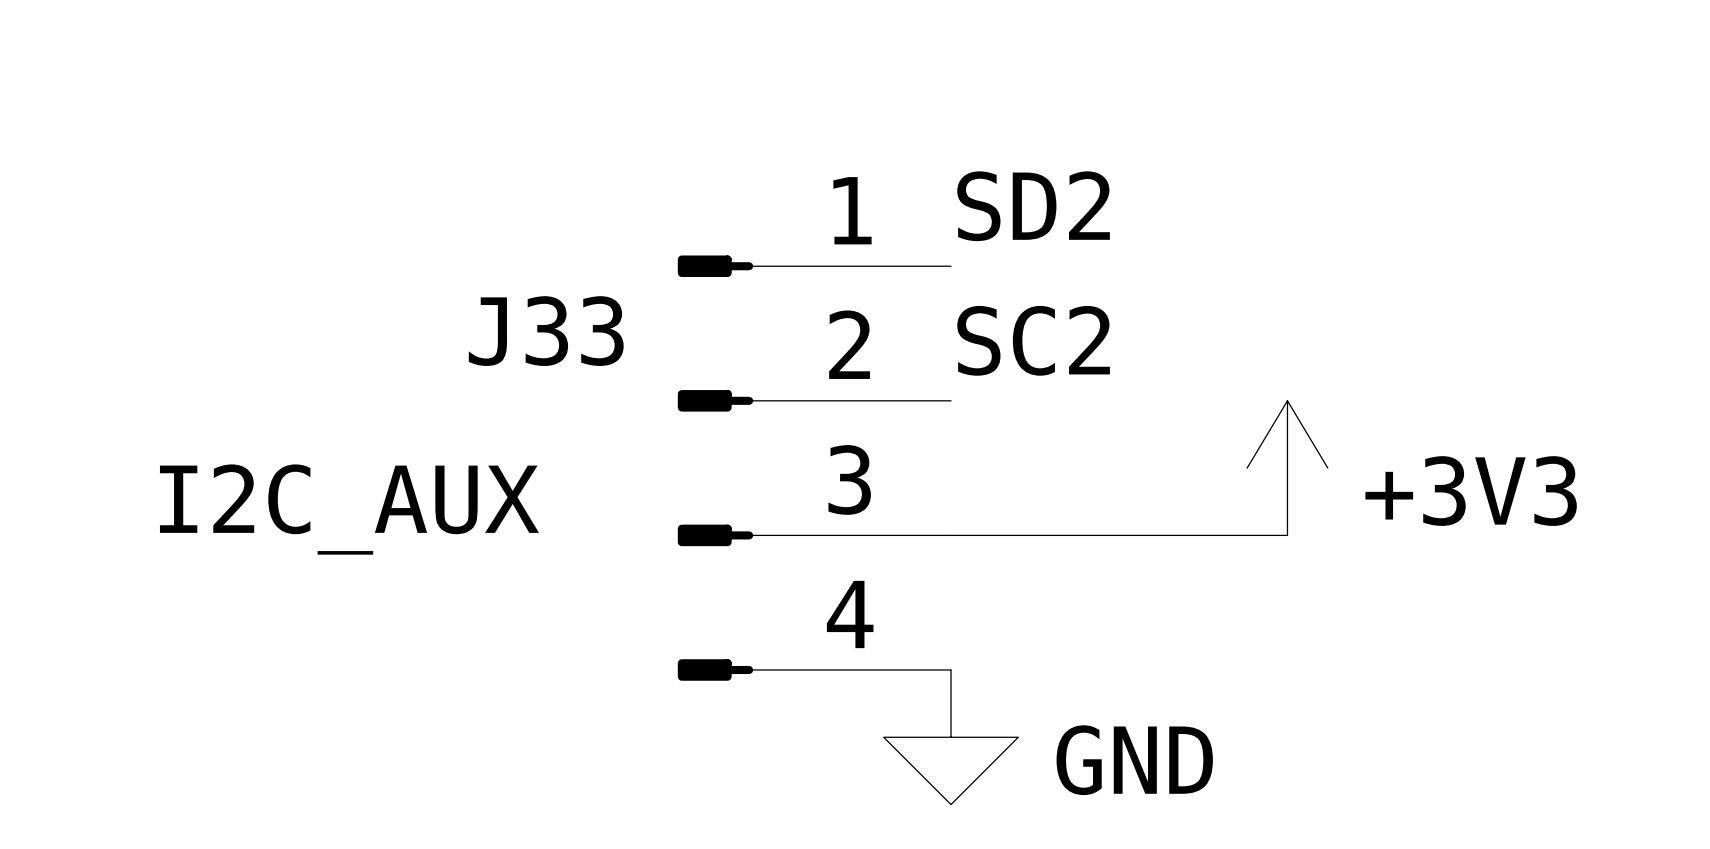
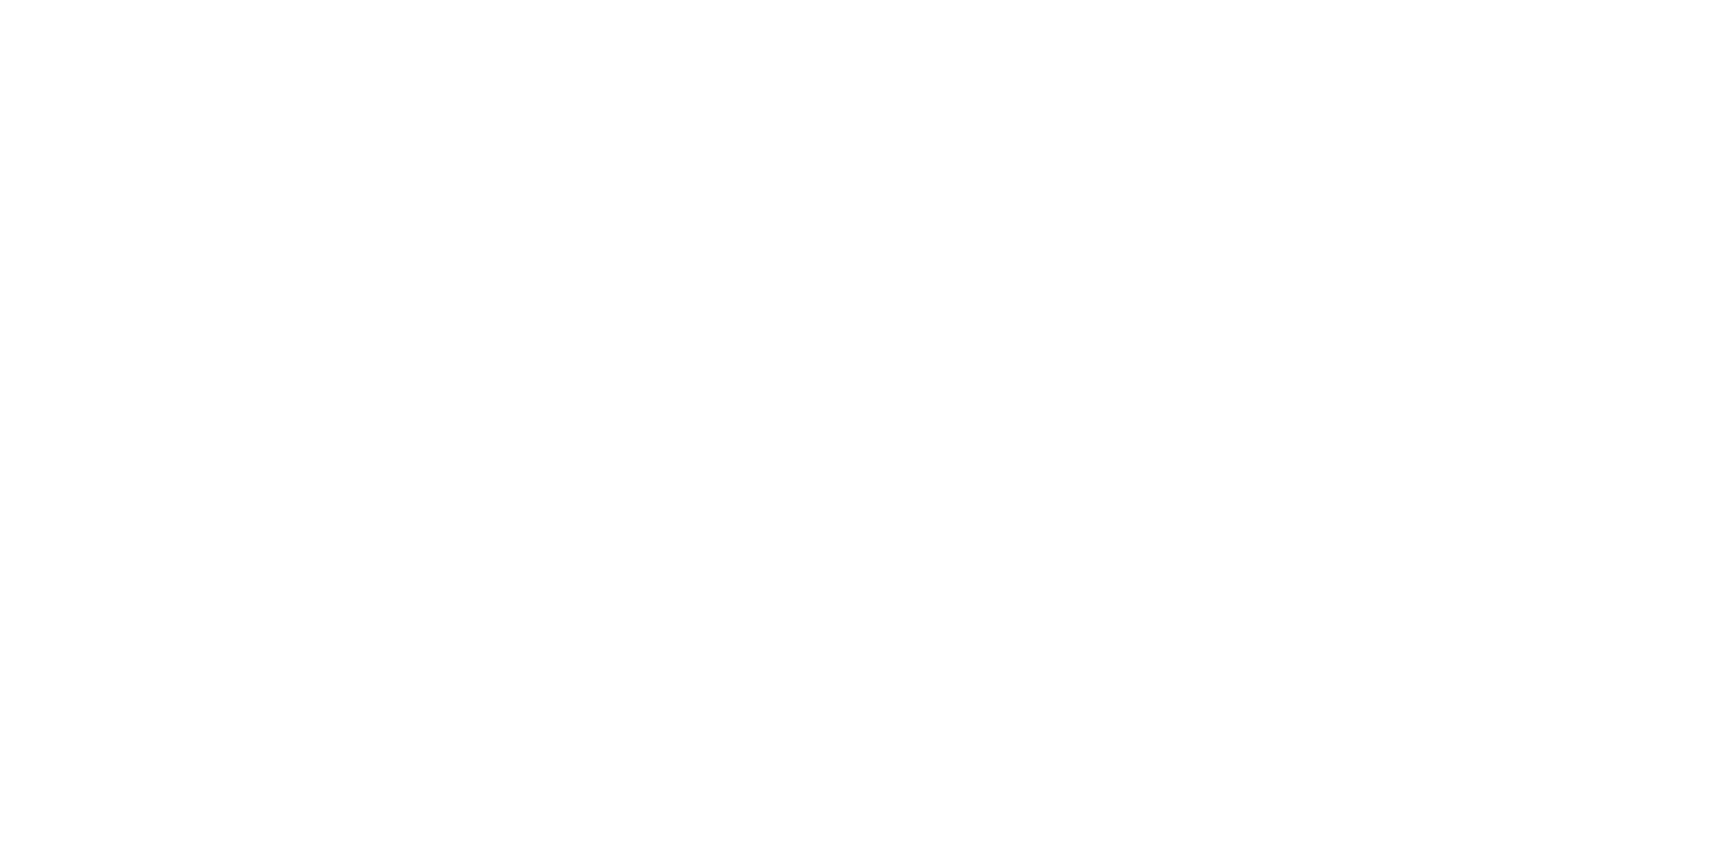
label: SD2 (1033, 206) -> none
label: SC2 (1033, 340) -> none
J33: I2C_AUX (814, 468) -> none
power symbol: +3V3 (1287, 468) -> none
wire: (951, 535) (1287, 535) -> none
power symbol: GND (951, 737) -> none

